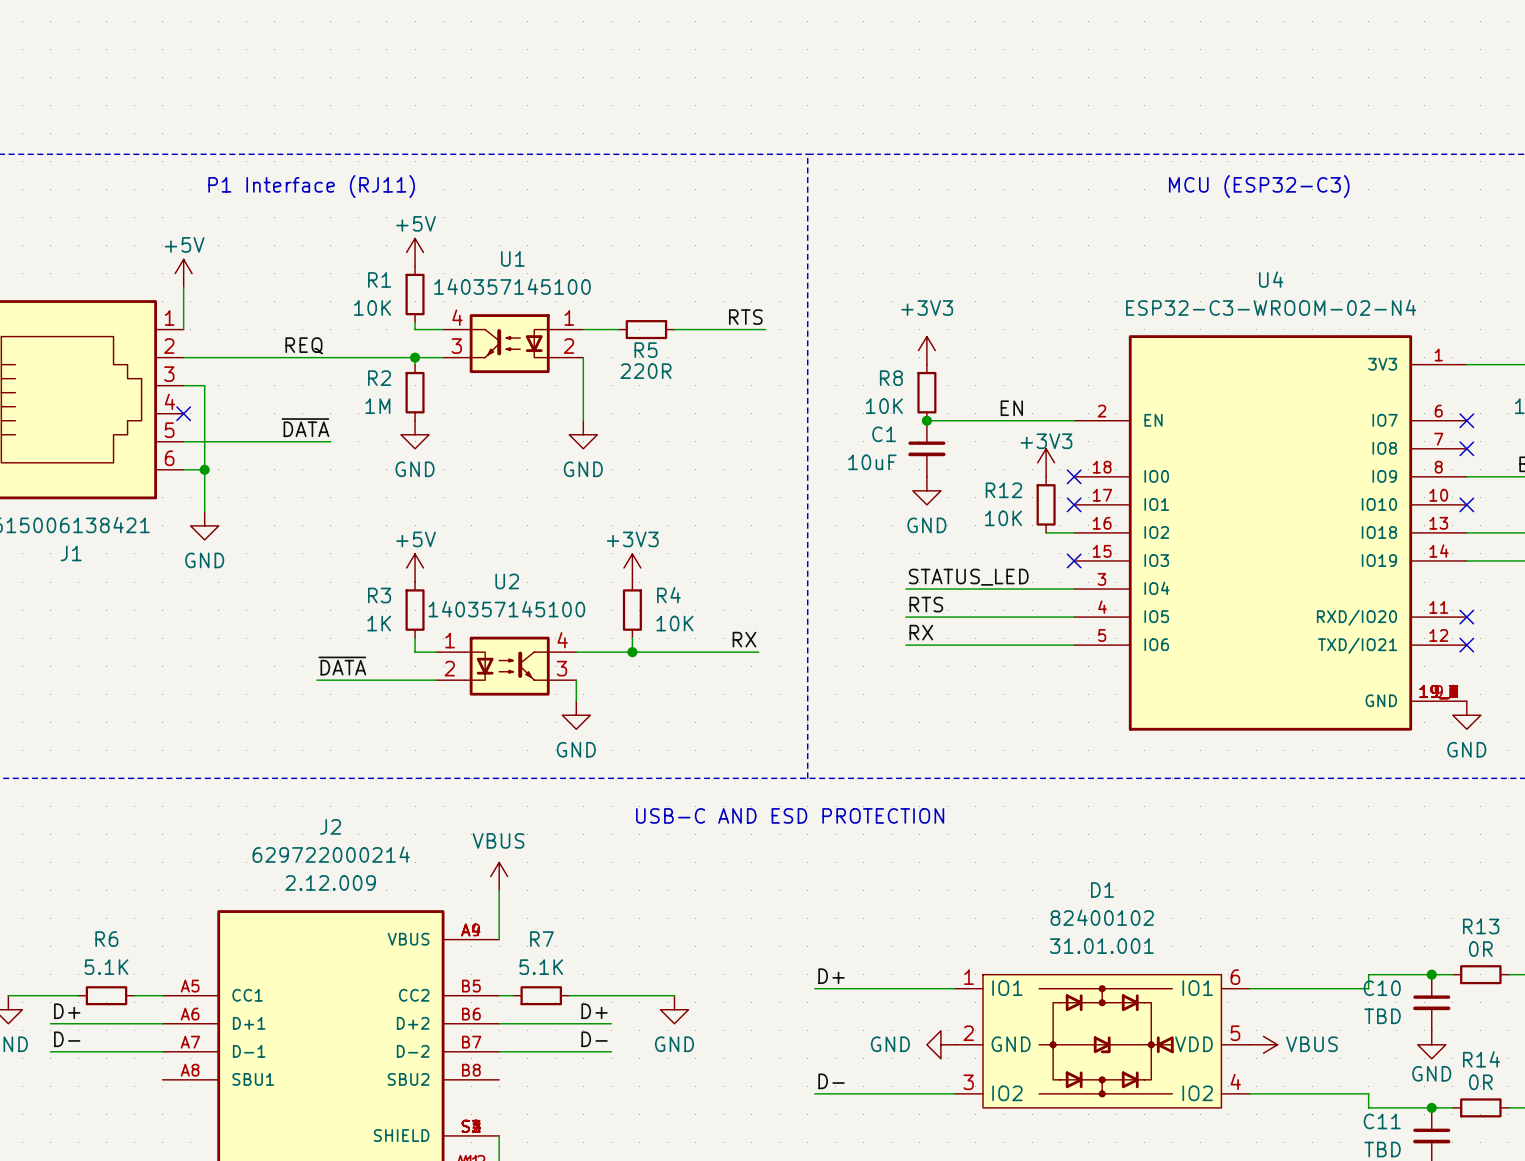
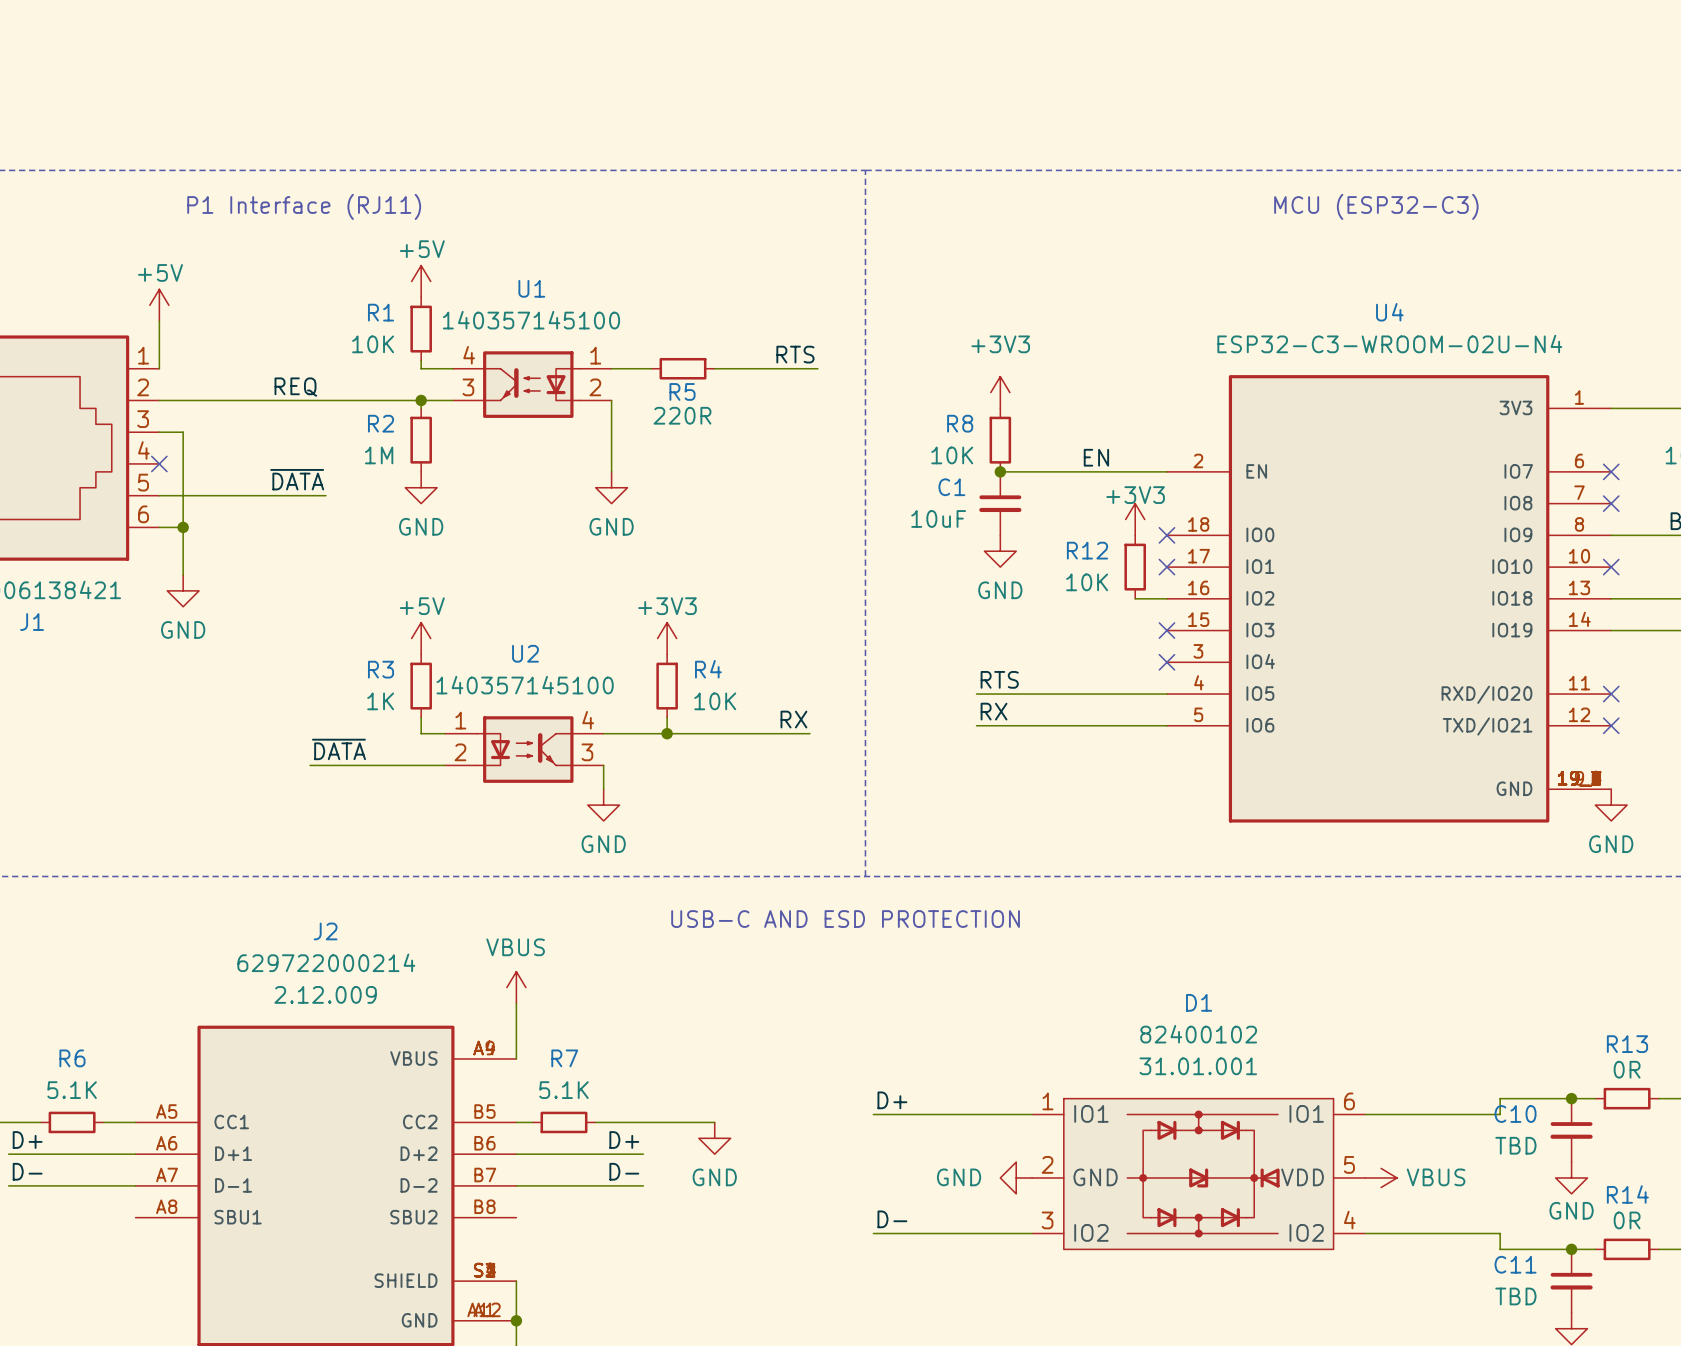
U4 value: ESP32-C3-WROOM-02-N4 (1271, 307) -> ESP32-C3-WROOM-02U-N4 (1389, 343)
label: STATUS_LED (968, 577) -> none
wire: (905, 589) (1074, 589) -> none
no-connect mark: none -> (1166, 662)

